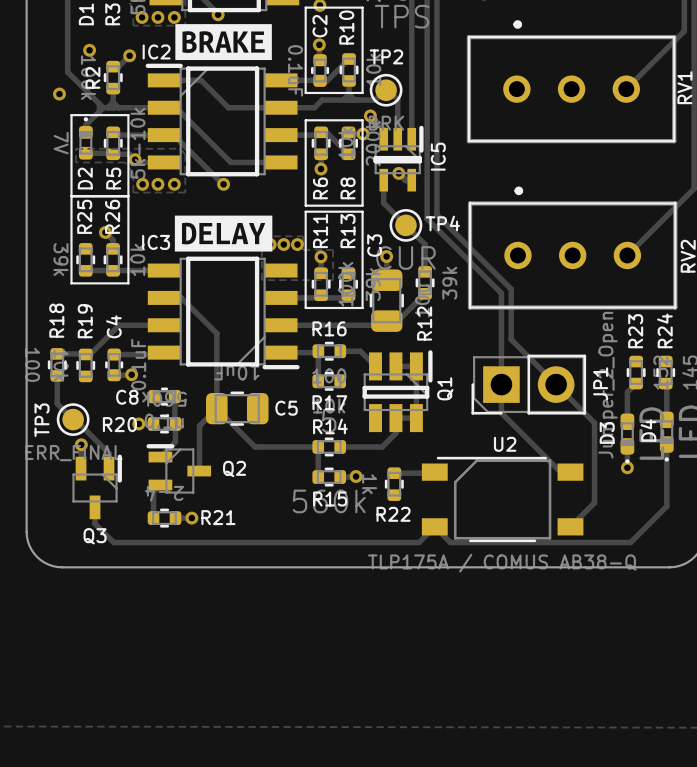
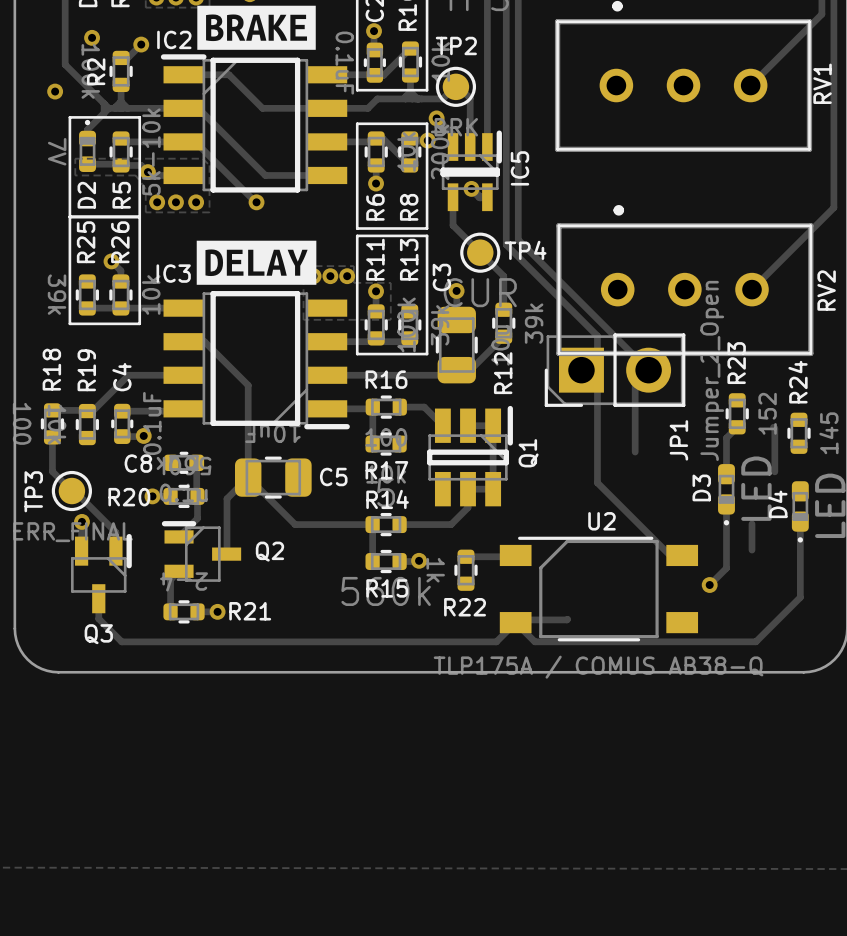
track: (511, 289) (511, 339) (594, 422) (594, 502) (570, 526) -> (609, 331) (648, 370) (635, 383) (635, 452)
R23 position: (636, 372) -> (737, 413)
JP1 name position: JP1 (600, 383) -> JP1 (678, 440)
track: (636, 383) (627, 392) (627, 421) -> (737, 427) (726, 438) (726, 474)
track: (665, 383) (666, 419) -> (773, 427) (774, 471)
JP1 position: (528, 384) -> (615, 370)
track: none -> (726, 504) (726, 568) (709, 585)
D3 position: (627, 438) -> (726, 494)
via position: (627, 467) -> (709, 585)
track: none -> (567, 619) (518, 619)

